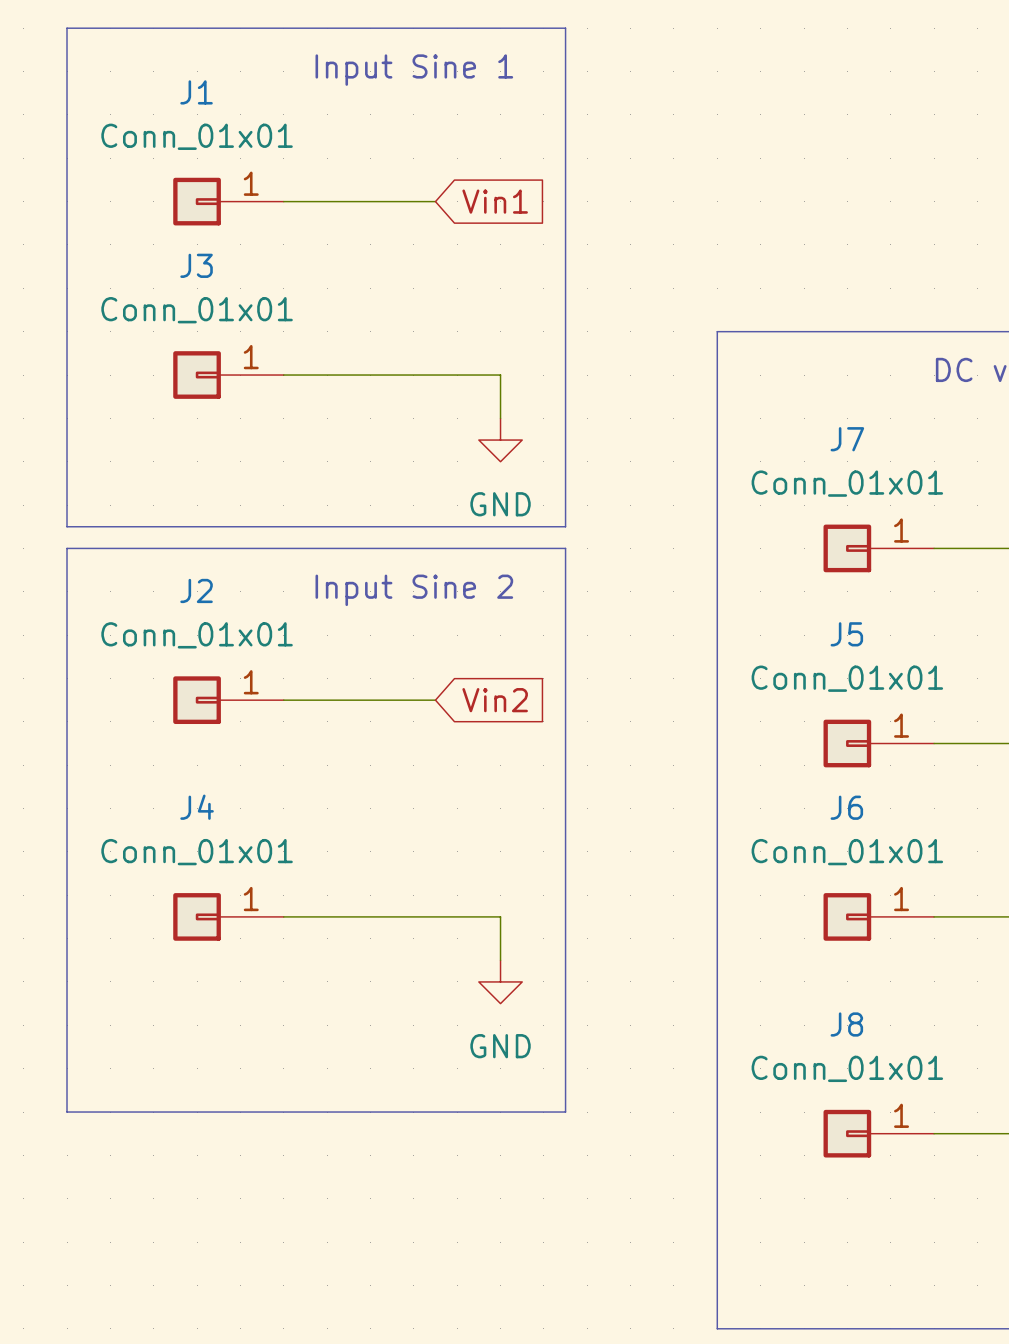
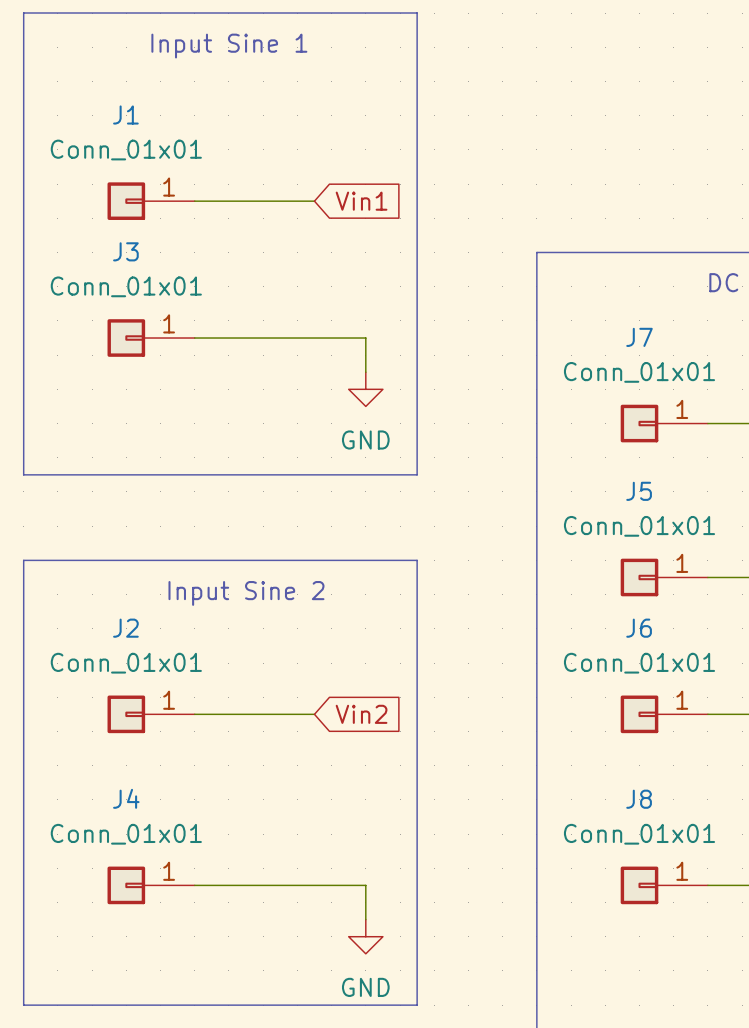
text position: Input Sine 1 (414, 70) -> Input Sine 1 (229, 46)
J1 position: (228, 201) -> (151, 201)
wire: (283, 201) (435, 201) -> (194, 201) (314, 201)
global label position: Vin1 (495, 201) -> Vin1 (361, 201)
J3 position: (228, 375) -> (151, 338)
wire: (283, 375) (500, 375) (500, 418) -> (194, 338) (365, 338) (365, 372)
power symbol position: GND (500, 440) -> GND (365, 389)
line: (67, 526) (565, 526) -> (23, 406) (23, 423)
line: (67, 548) (565, 548) -> (417, 406) (417, 423)
text position: Input Sine 2 (414, 590) -> Input Sine 2 (246, 593)
line: (67, 613) (67, 721) -> (23, 474) (417, 474)
line: (565, 613) (565, 721) -> (23, 560) (417, 560)
J2: Conn_01x01 (228, 700) -> none
wire: (283, 700) (435, 700) -> none
global label position: Vin2 (495, 700) -> Vin2 (361, 714)
J4 name: J4 (197, 807) -> J2 (125, 628)
wire: (435, 916) (500, 916) (500, 960) -> none
power symbol position: GND (500, 981) -> GND (365, 936)
line: (67, 1112) (565, 1112) -> (23, 868) (23, 1005) (417, 1005) (417, 868)
J4: none -> Conn_01x01 (151, 885)
wire: none -> (194, 885) (365, 885) (365, 919)

